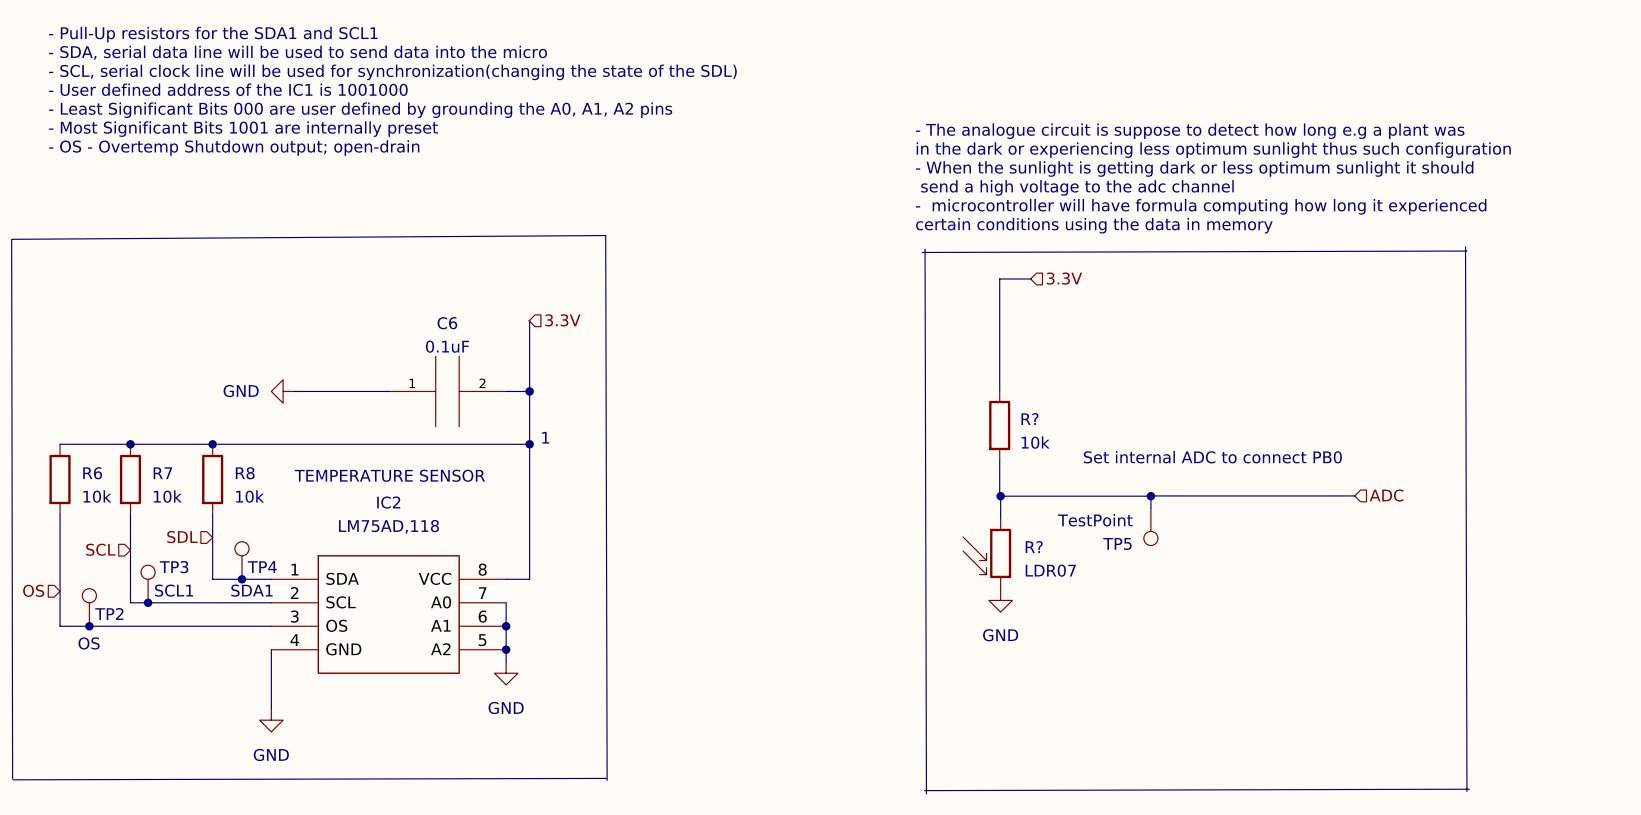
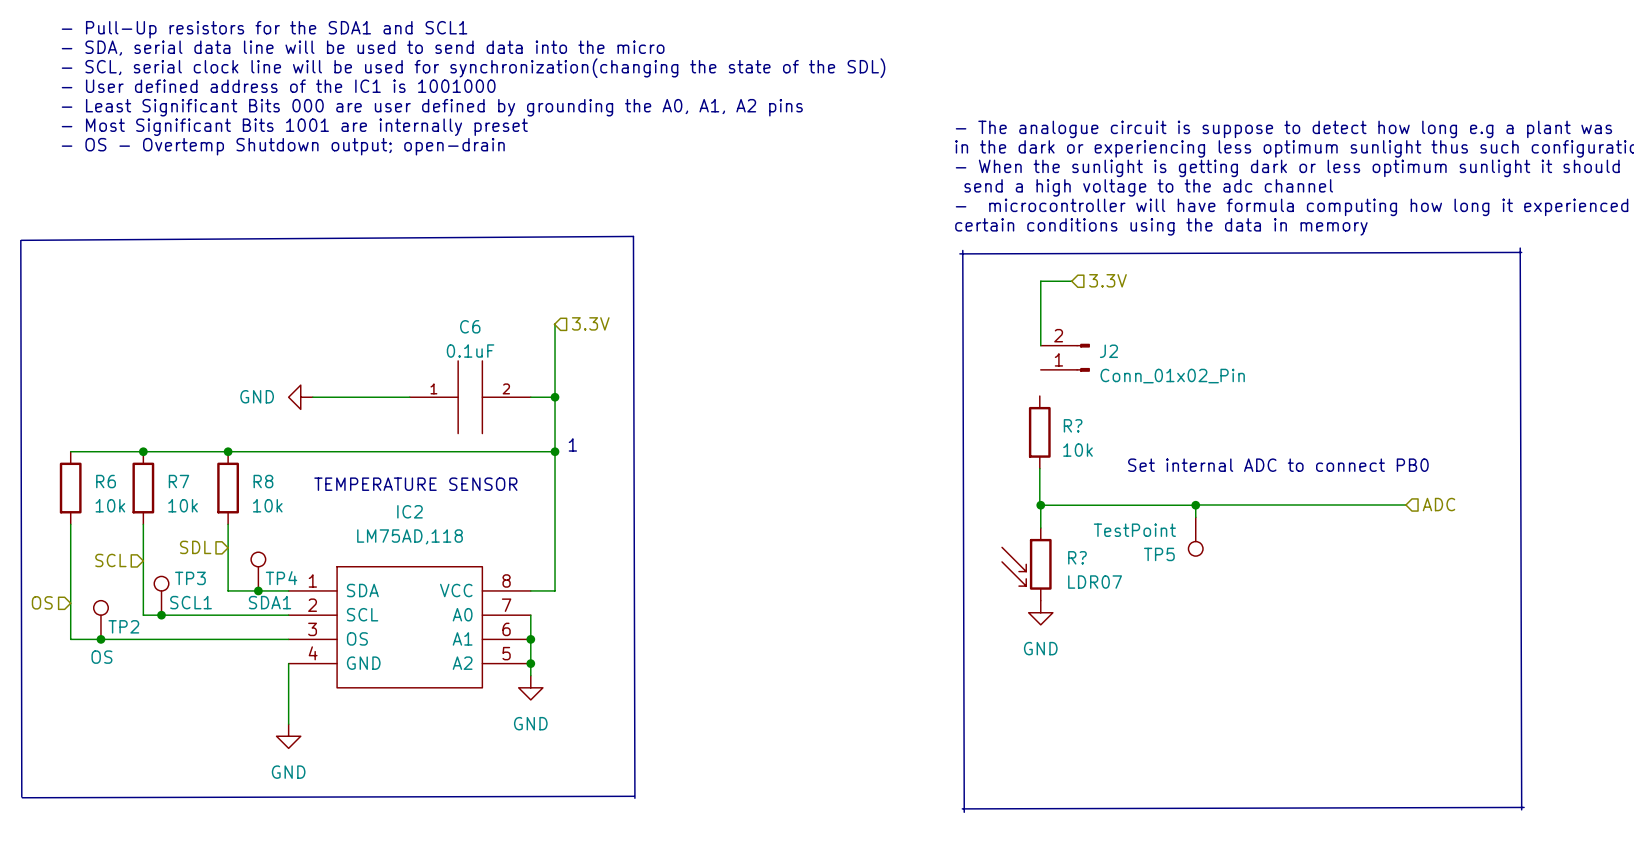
wire: (1000, 278) (999, 390) -> (1040, 281) (1040, 345)
J2: none -> Conn_01x02_Pin (1065, 357)

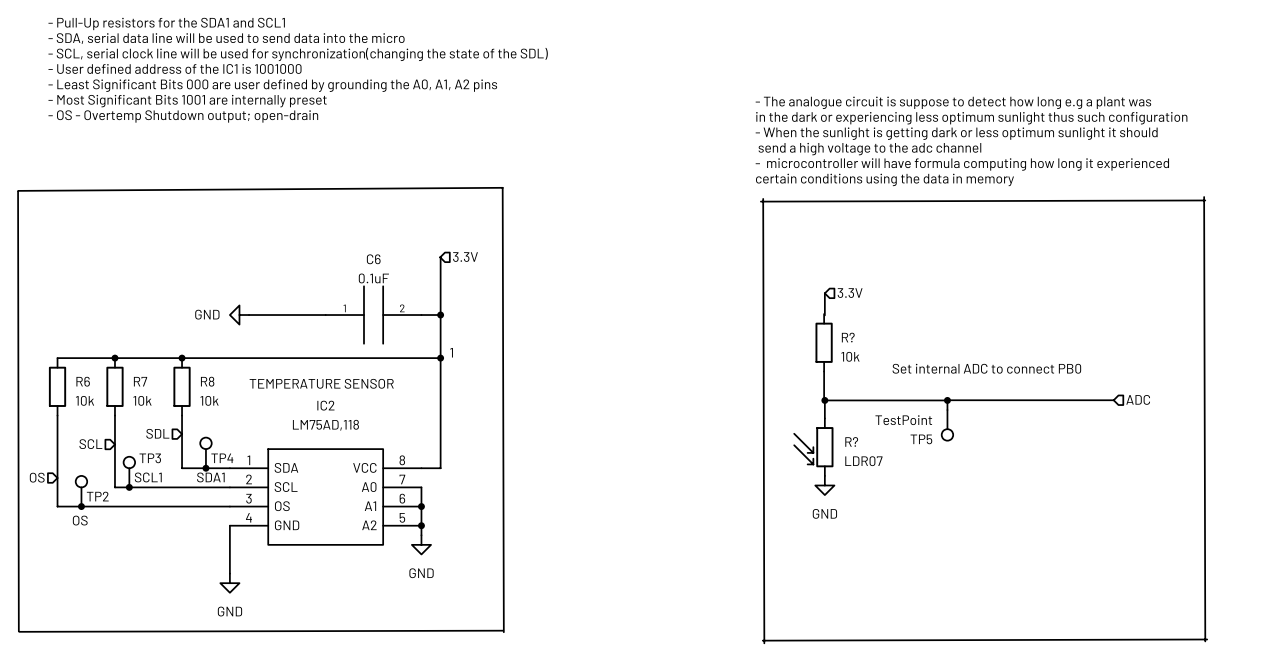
hierarchical label position: 3.3V (1107, 280) -> 3.3V (850, 293)
wire: (1071, 281) (1040, 281) (1040, 345) -> none
J2: Conn_01x02_Pin (1065, 357) -> none
wire: none -> (824, 293) (824, 315)

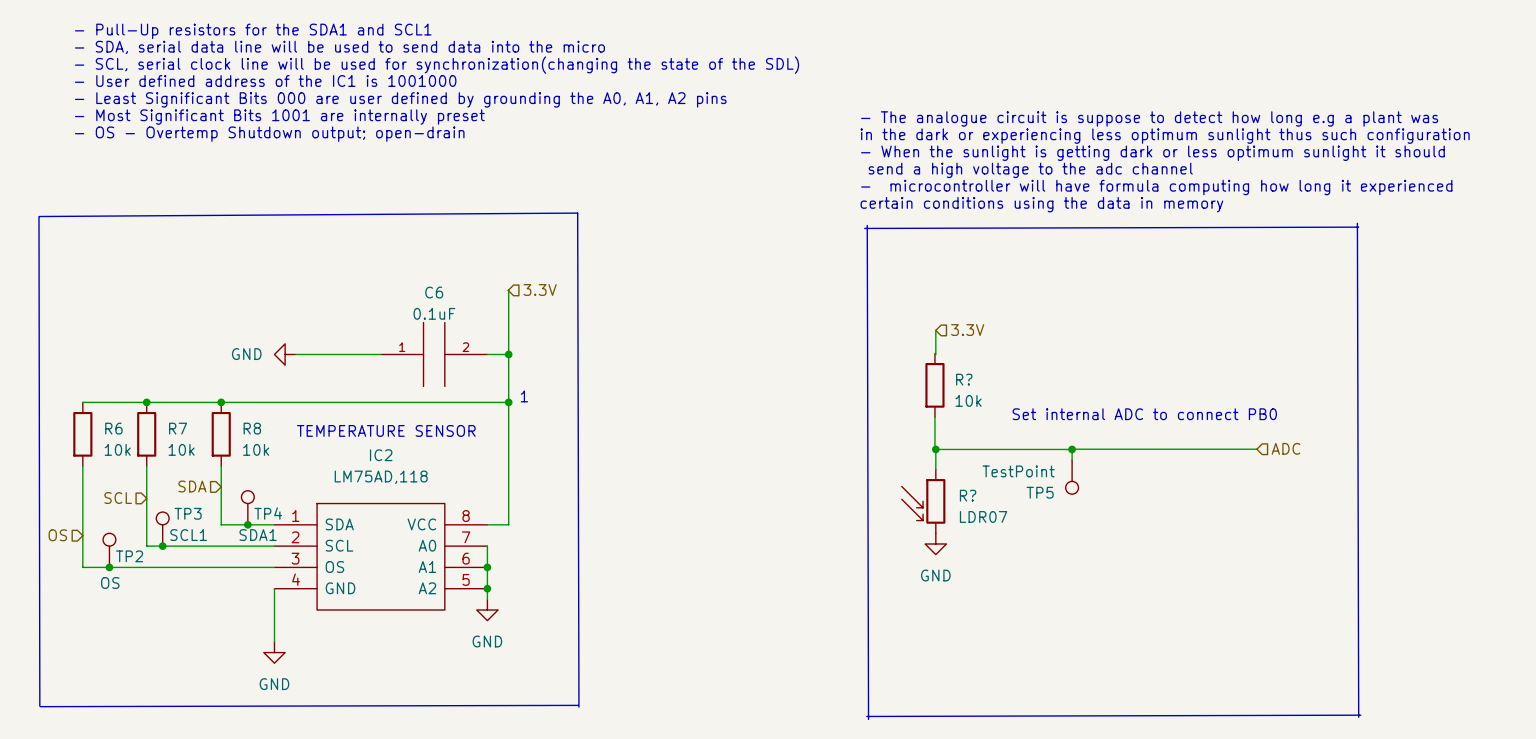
hierarchical label: SDL (157, 433) -> SDA (192, 486)

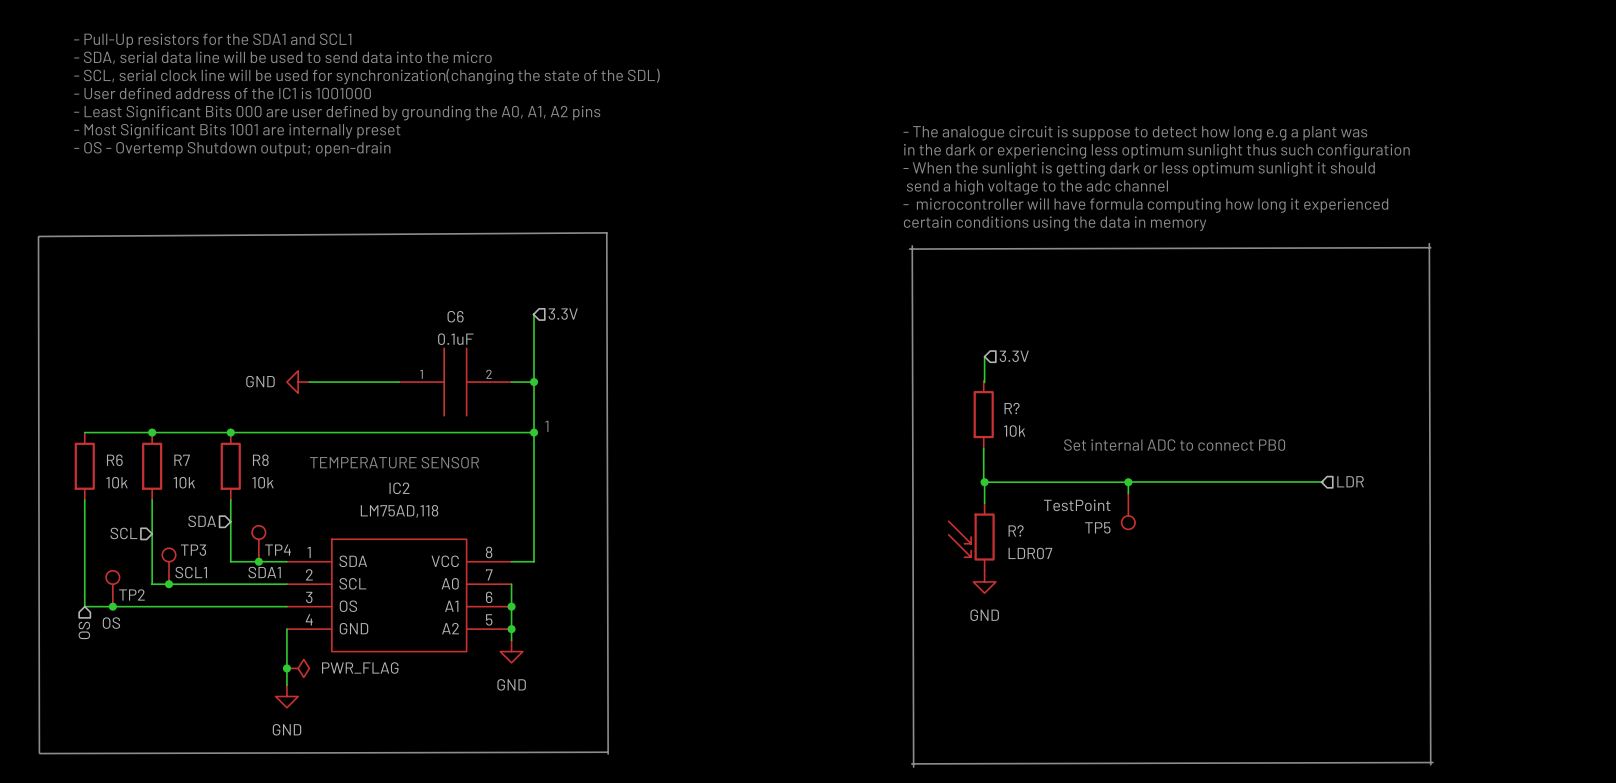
hierarchical label: ADC (1285, 448) -> LDR (1350, 481)
hierarchical label rotation: 0° (57, 535) -> 90° counterclockwise (84, 630)
hierarchical label position: OS (57, 535) -> OS (84, 630)
junction: none -> (286, 668)
power symbol: none -> PWR_FLAG (298, 668)

